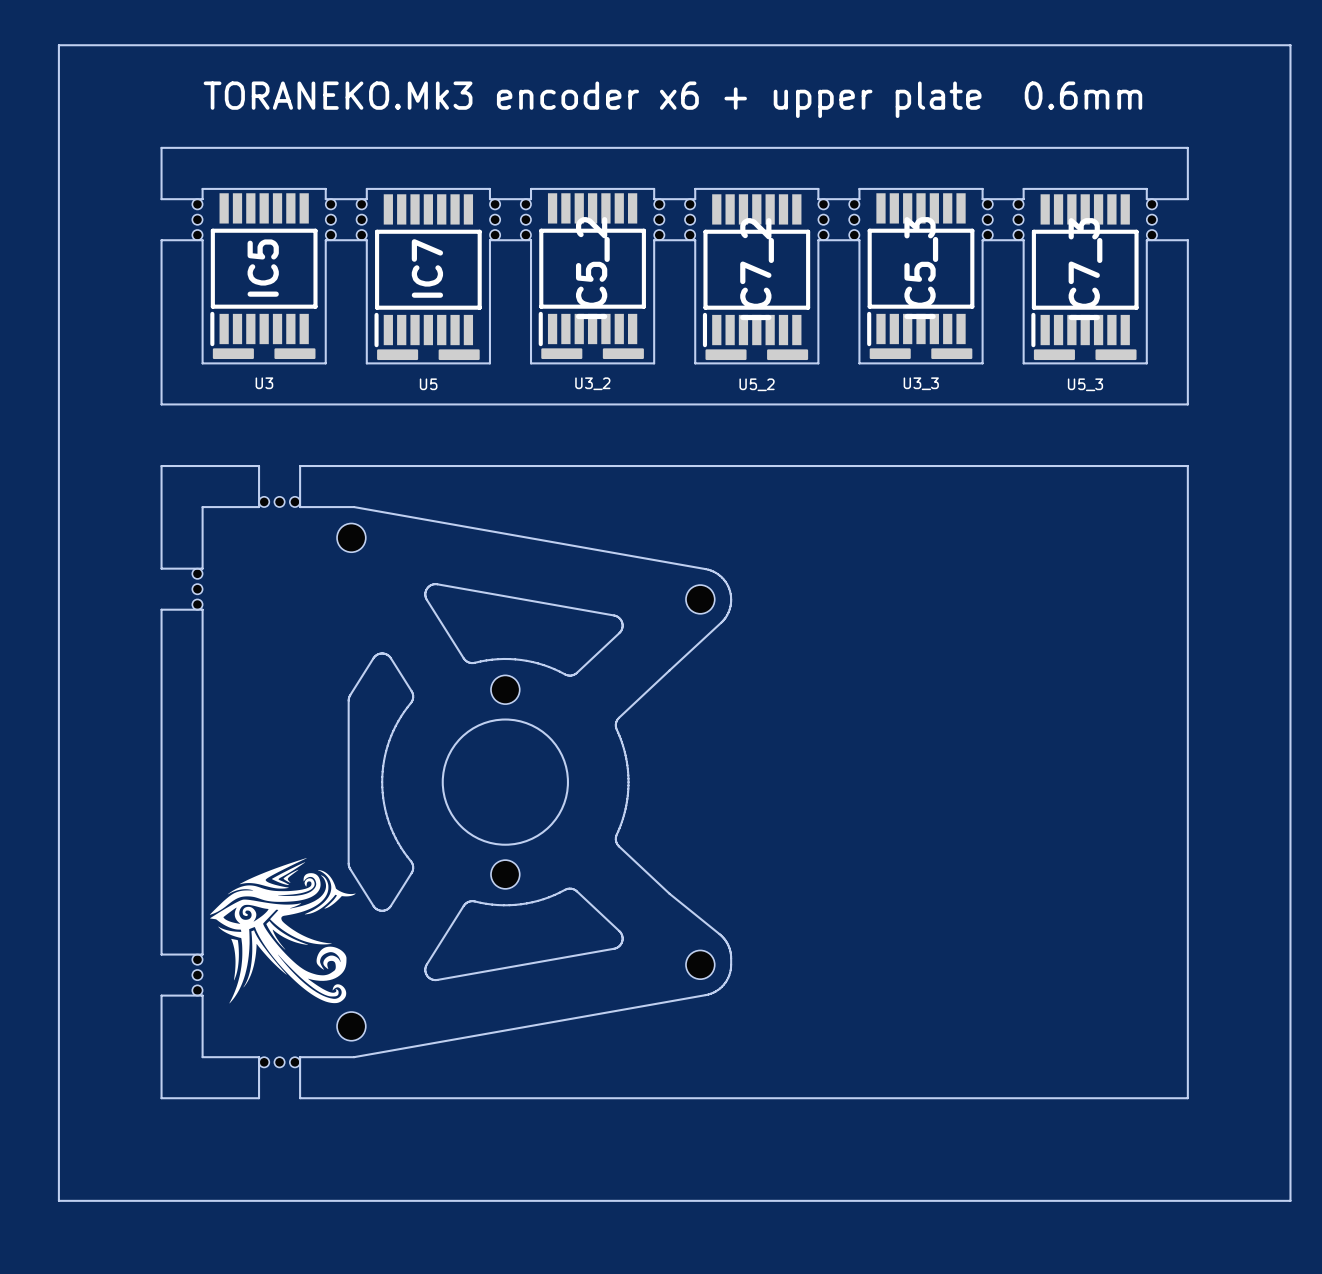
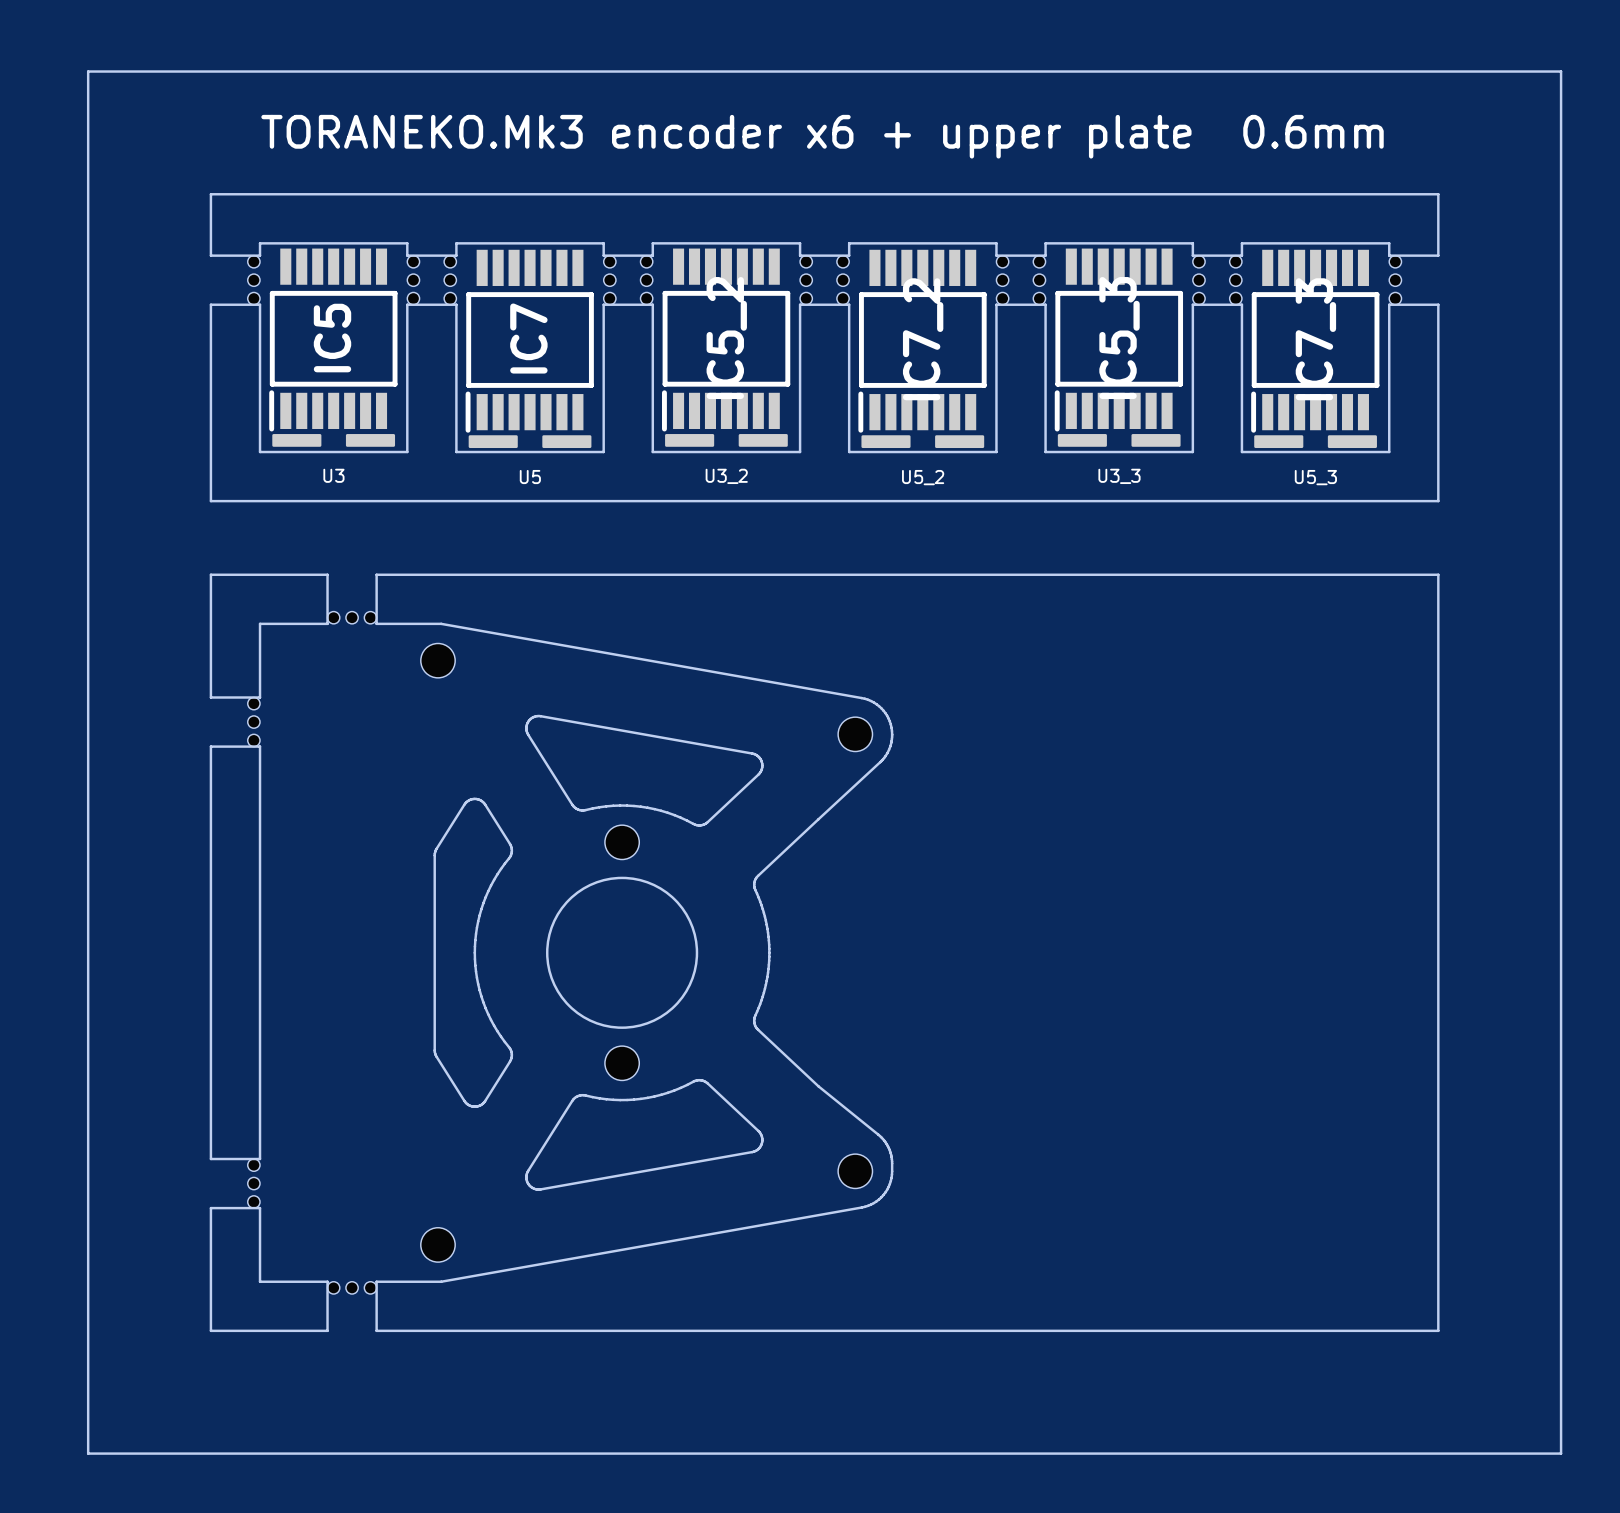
drawing: [209, 858, 356, 1004] -> none

